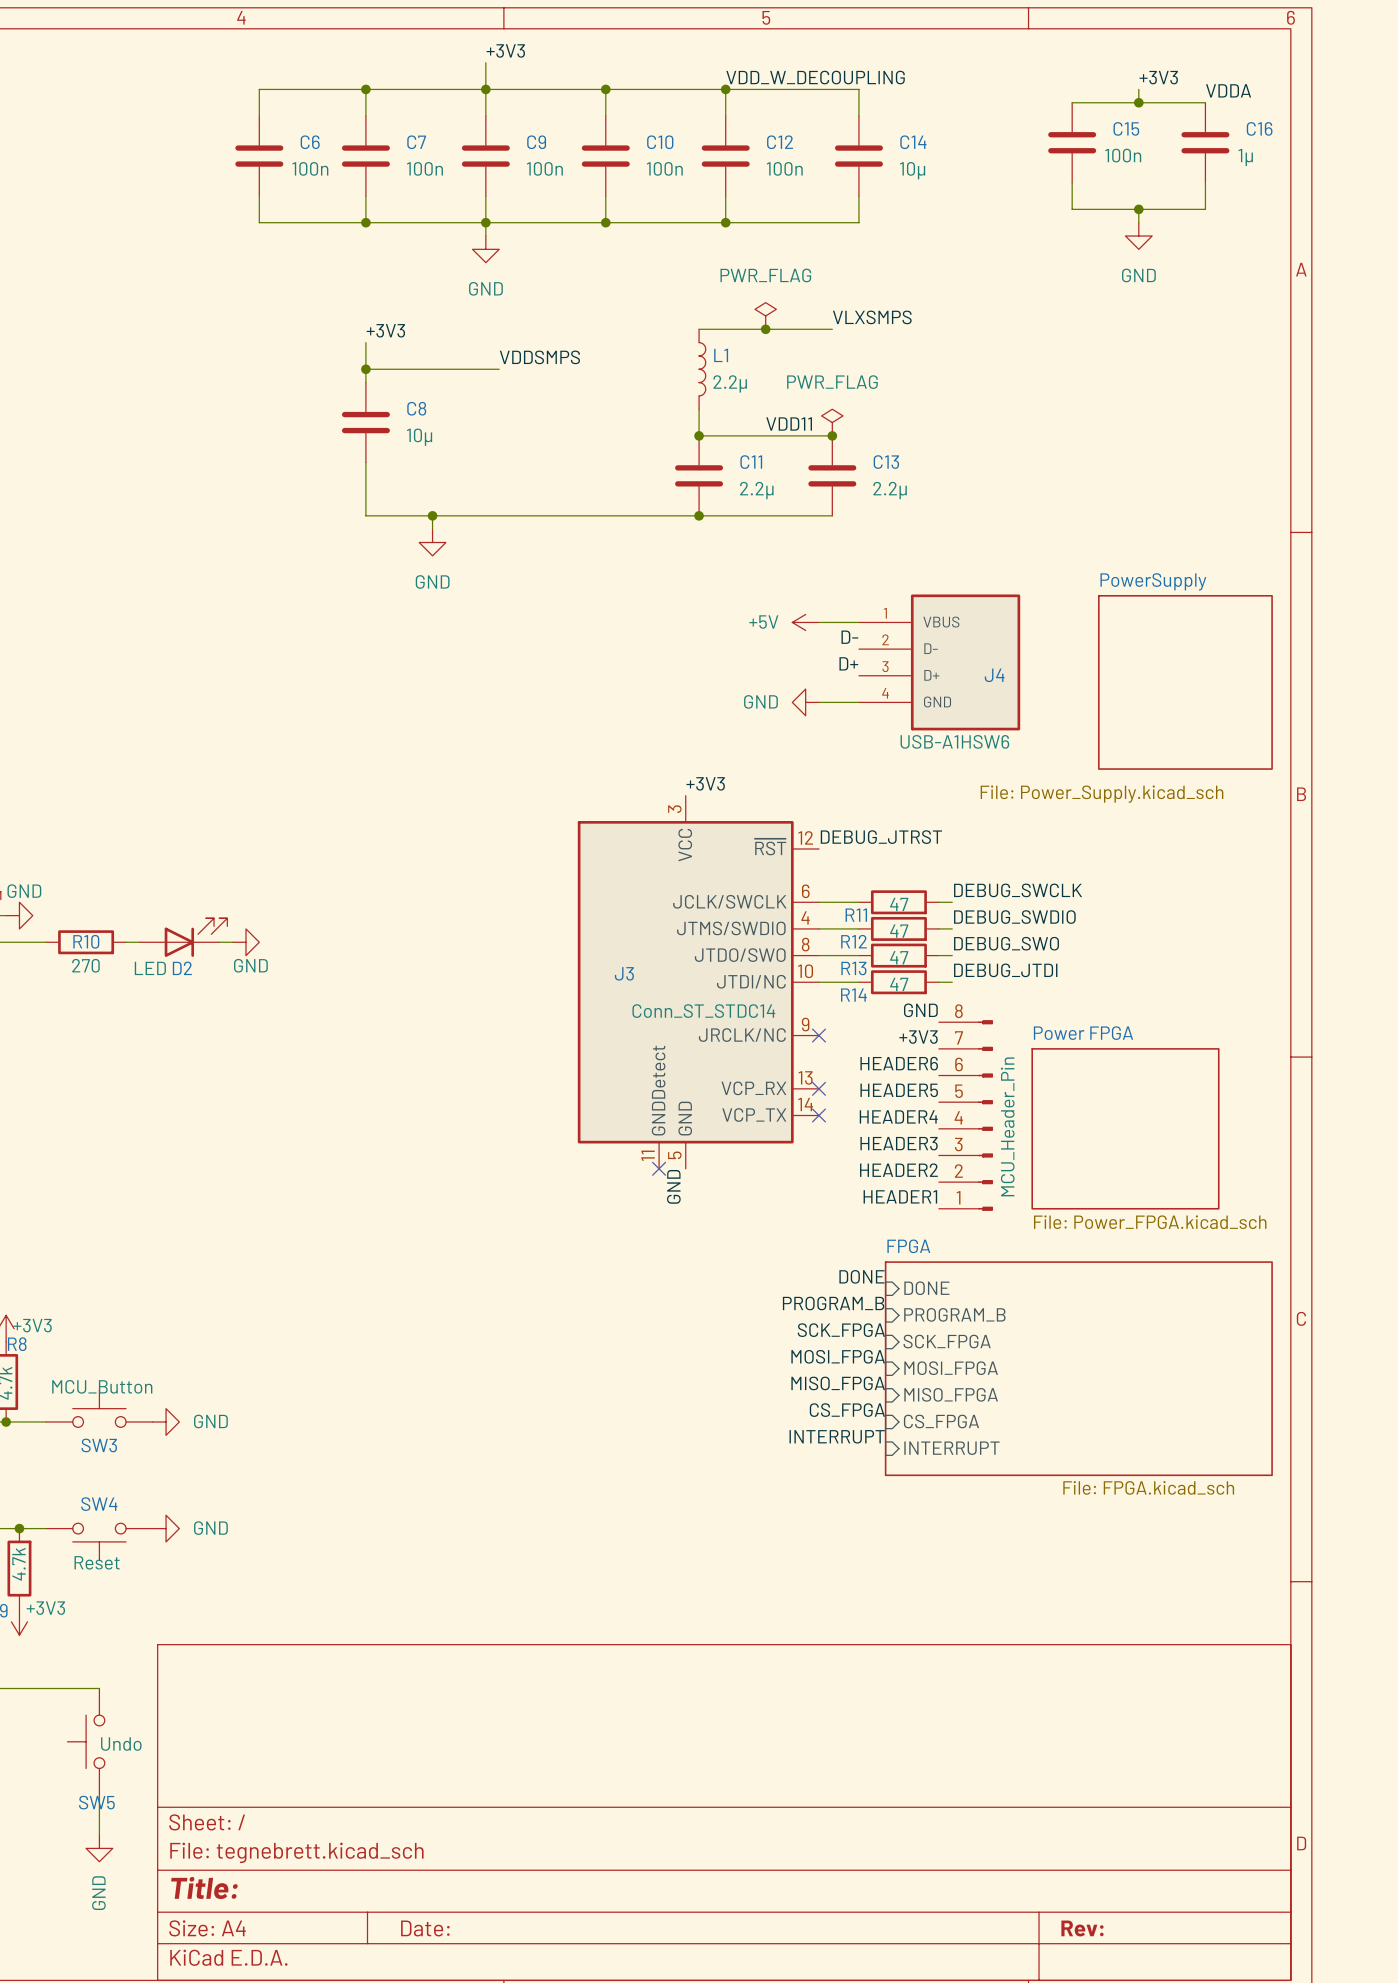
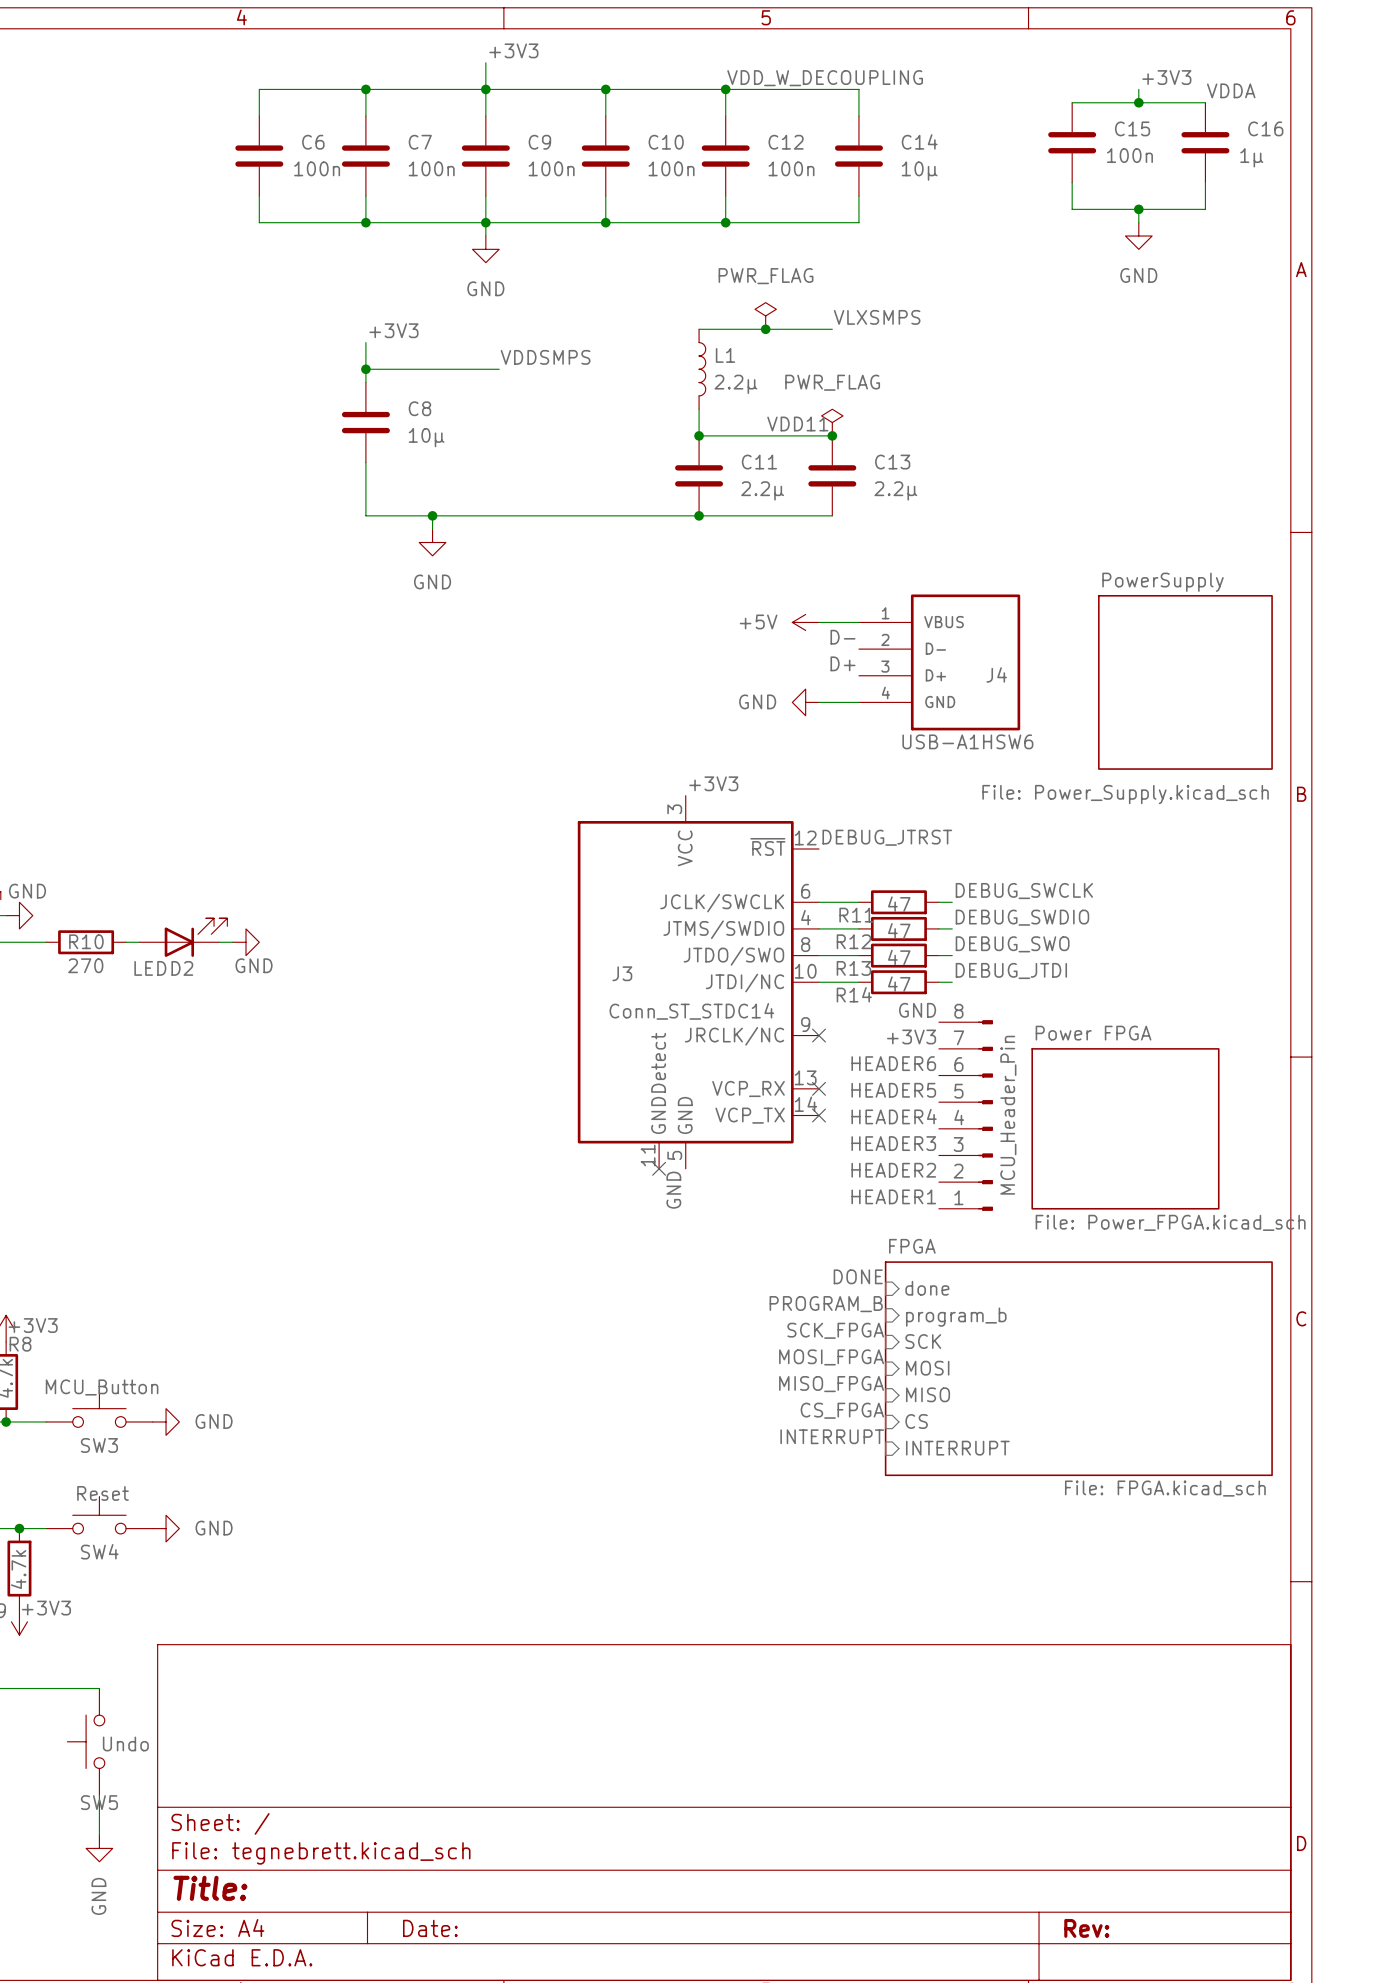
sheet pin: DONE (926, 1288) -> done (927, 1288)
sheet pin: PROGRAM_B (954, 1314) -> program_b (956, 1317)
sheet pin: SCK_FPGA (947, 1341) -> SCK (923, 1341)
sheet pin: MOSI_FPGA (951, 1368) -> MOSI (927, 1368)
sheet pin: MISO_FPGA (951, 1394) -> MISO (928, 1394)
sheet pin: CS_FPGA (941, 1421) -> CS (916, 1421)
SW4 rotation: 0° (99, 1541) -> 180° (99, 1515)

